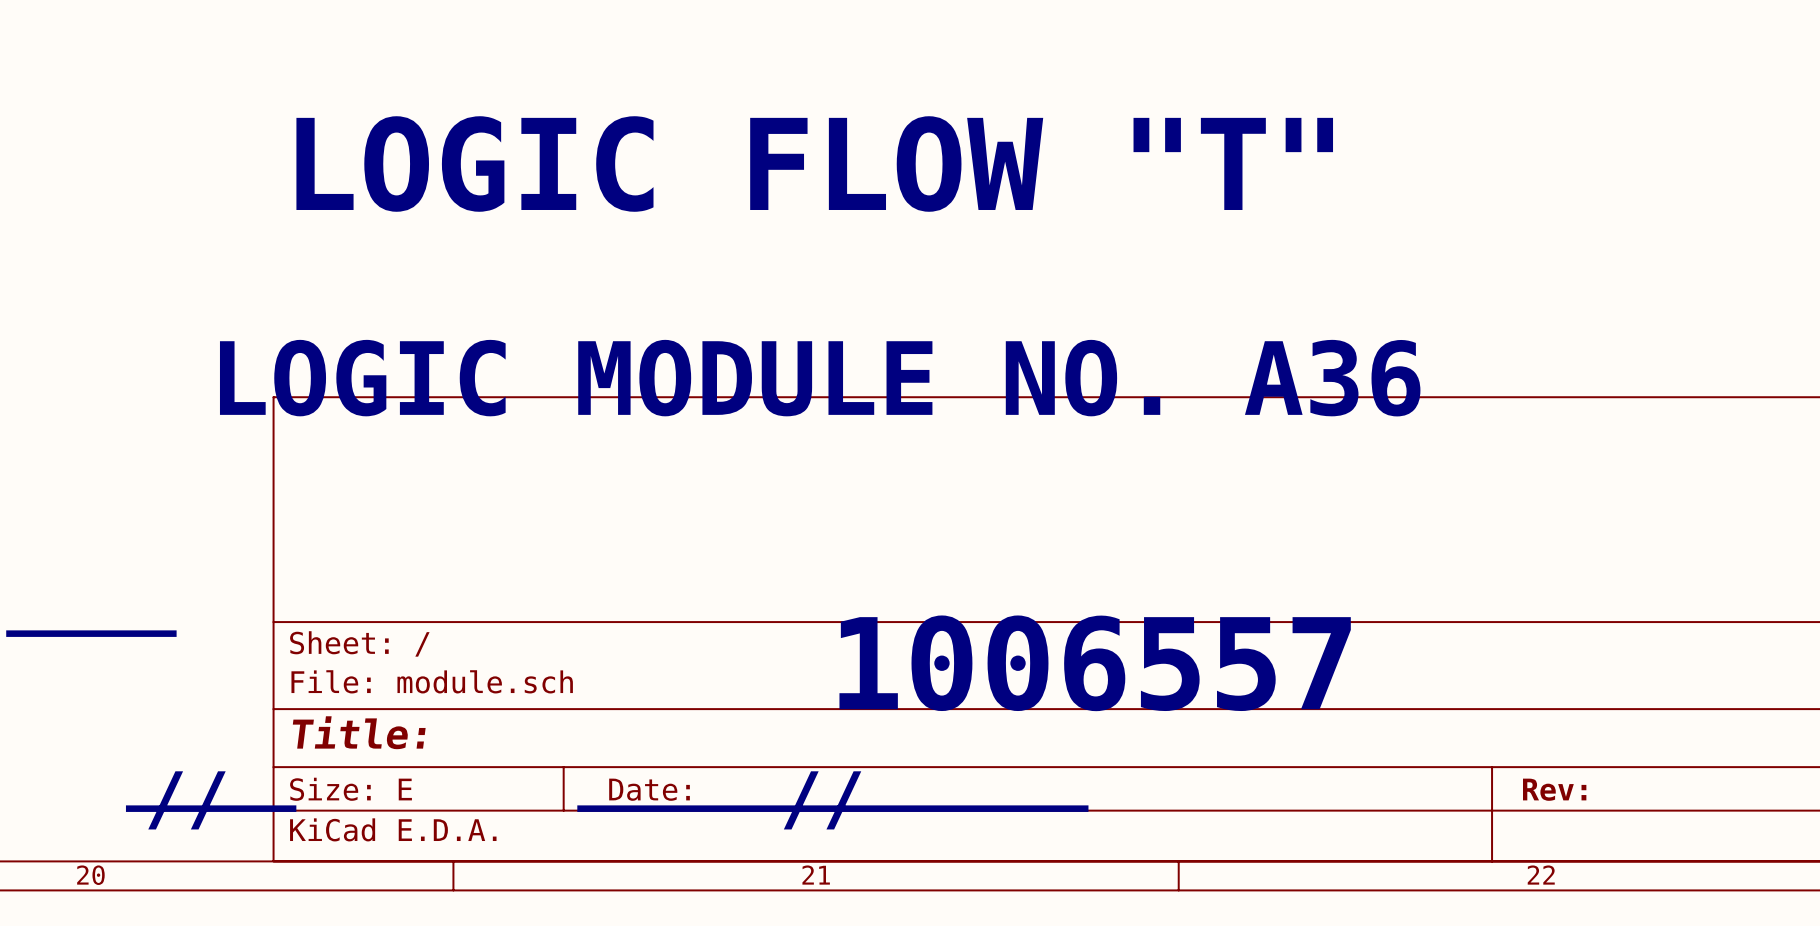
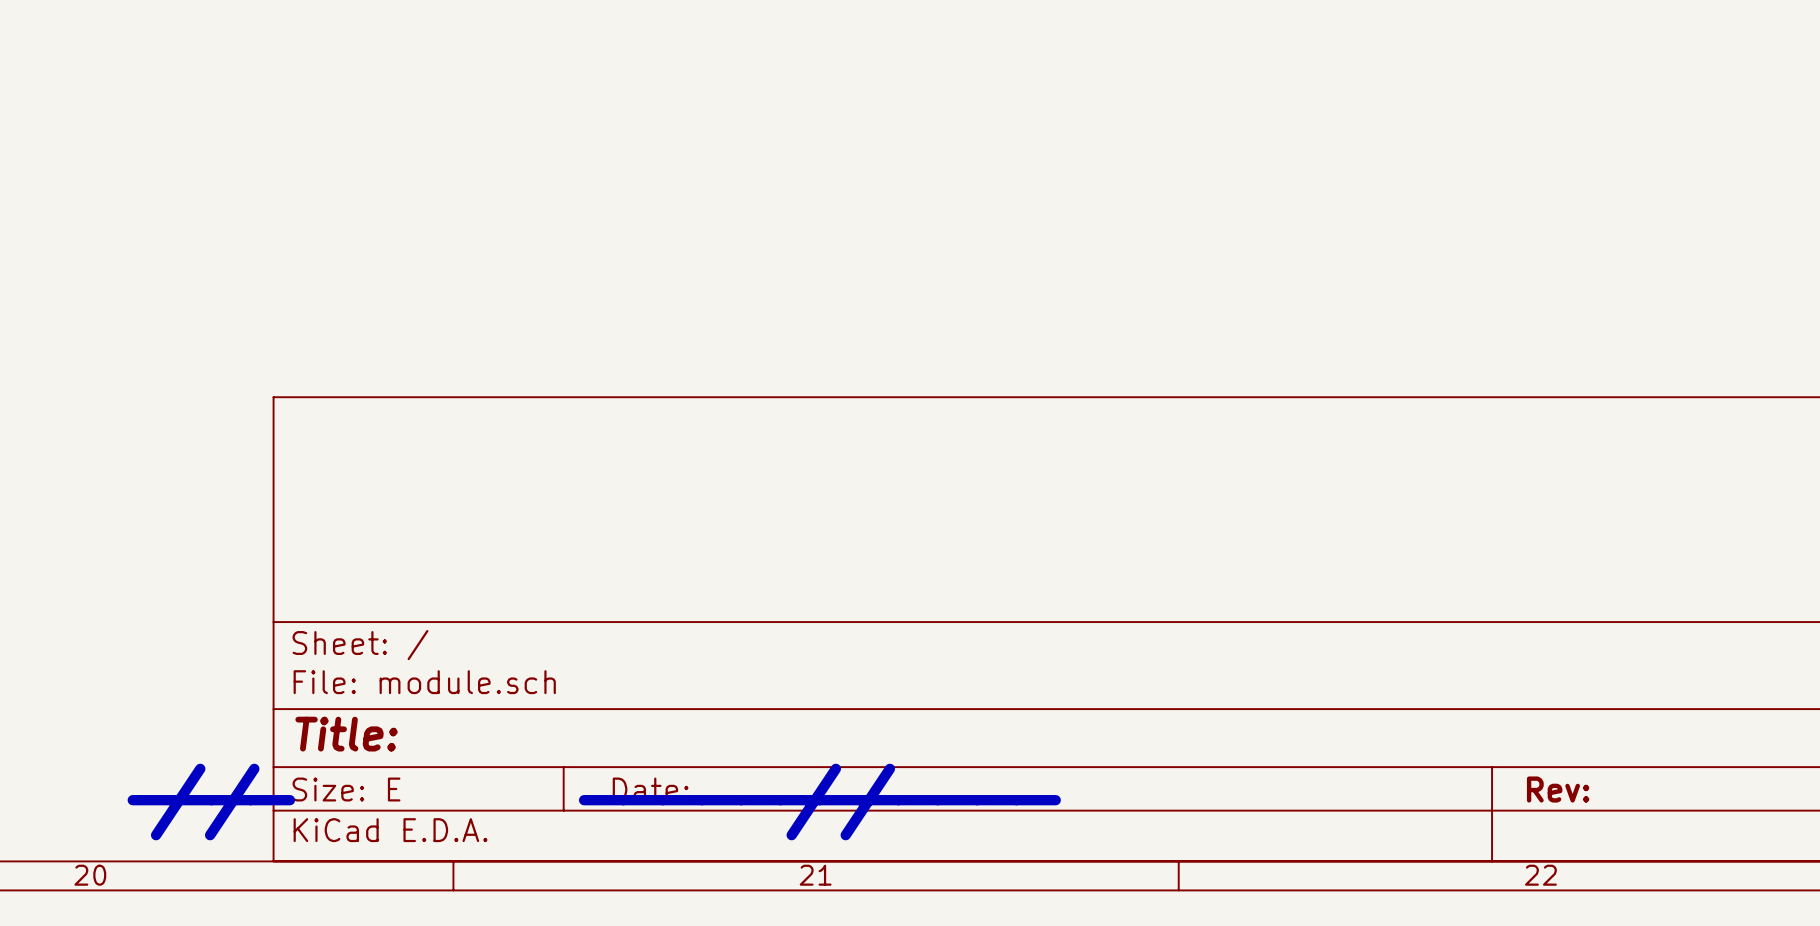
text: LOGIC FLOW "T" (814, 164) -> none
text: LOGIC MODULE NO. A36 (820, 378) -> none
text: ____ (91, 633) -> none
text: 1006557 (1095, 663) -> none

